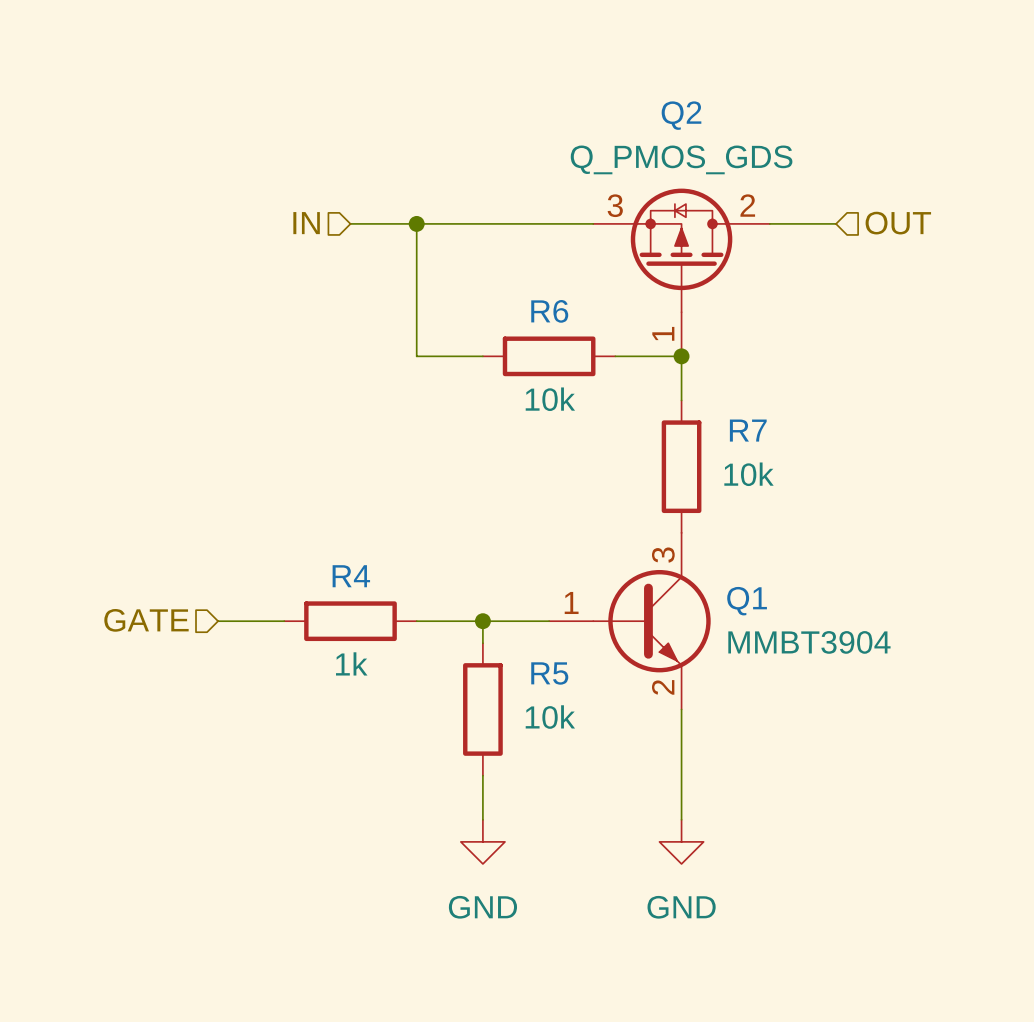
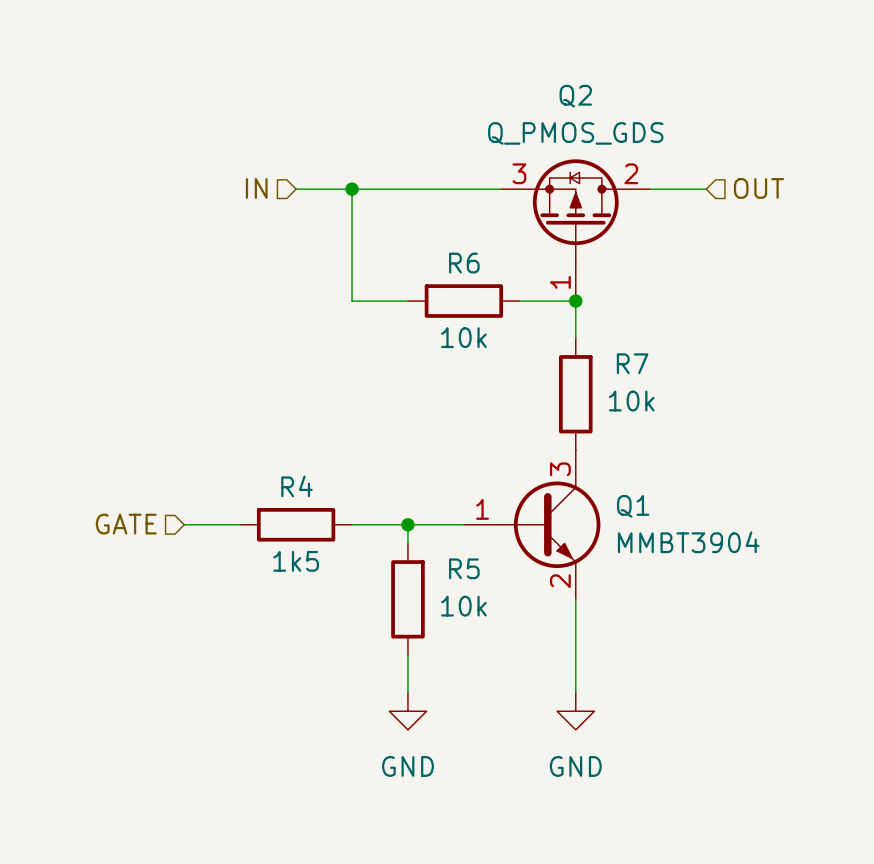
R4 value: 1k (351, 663) -> 1k5 (296, 561)

